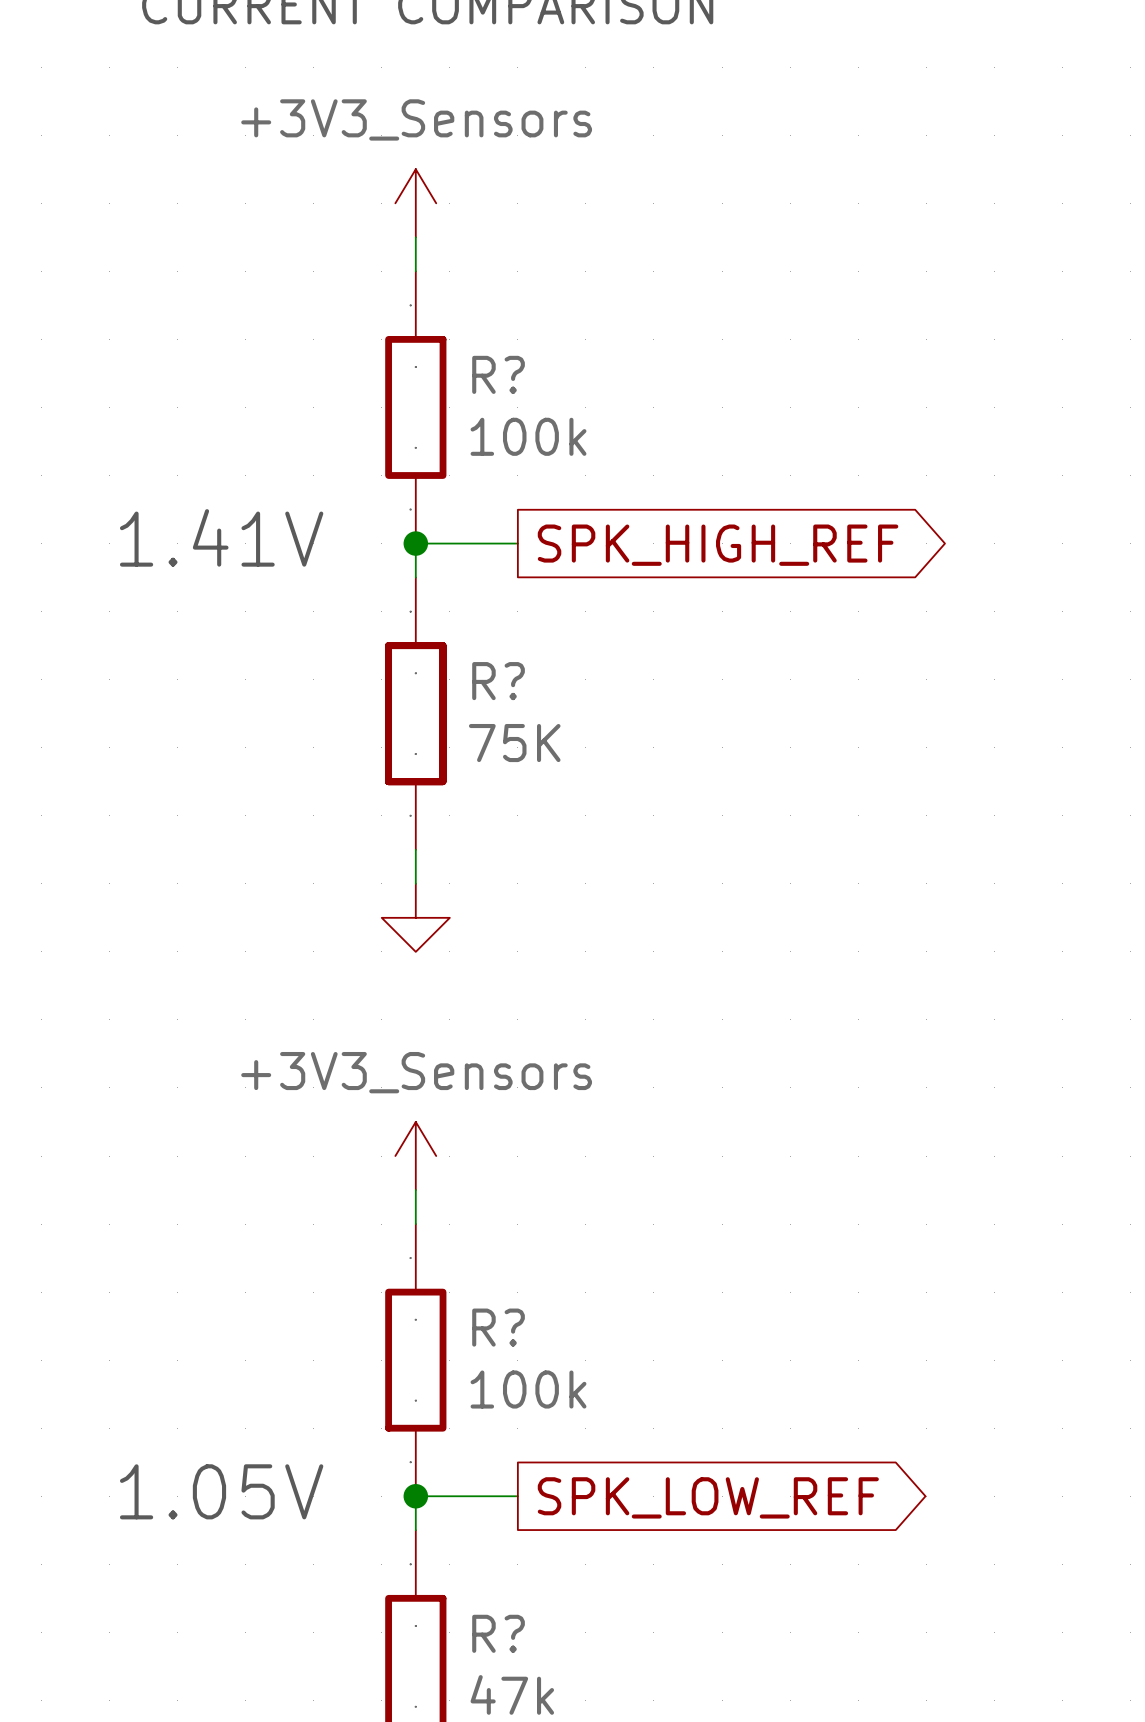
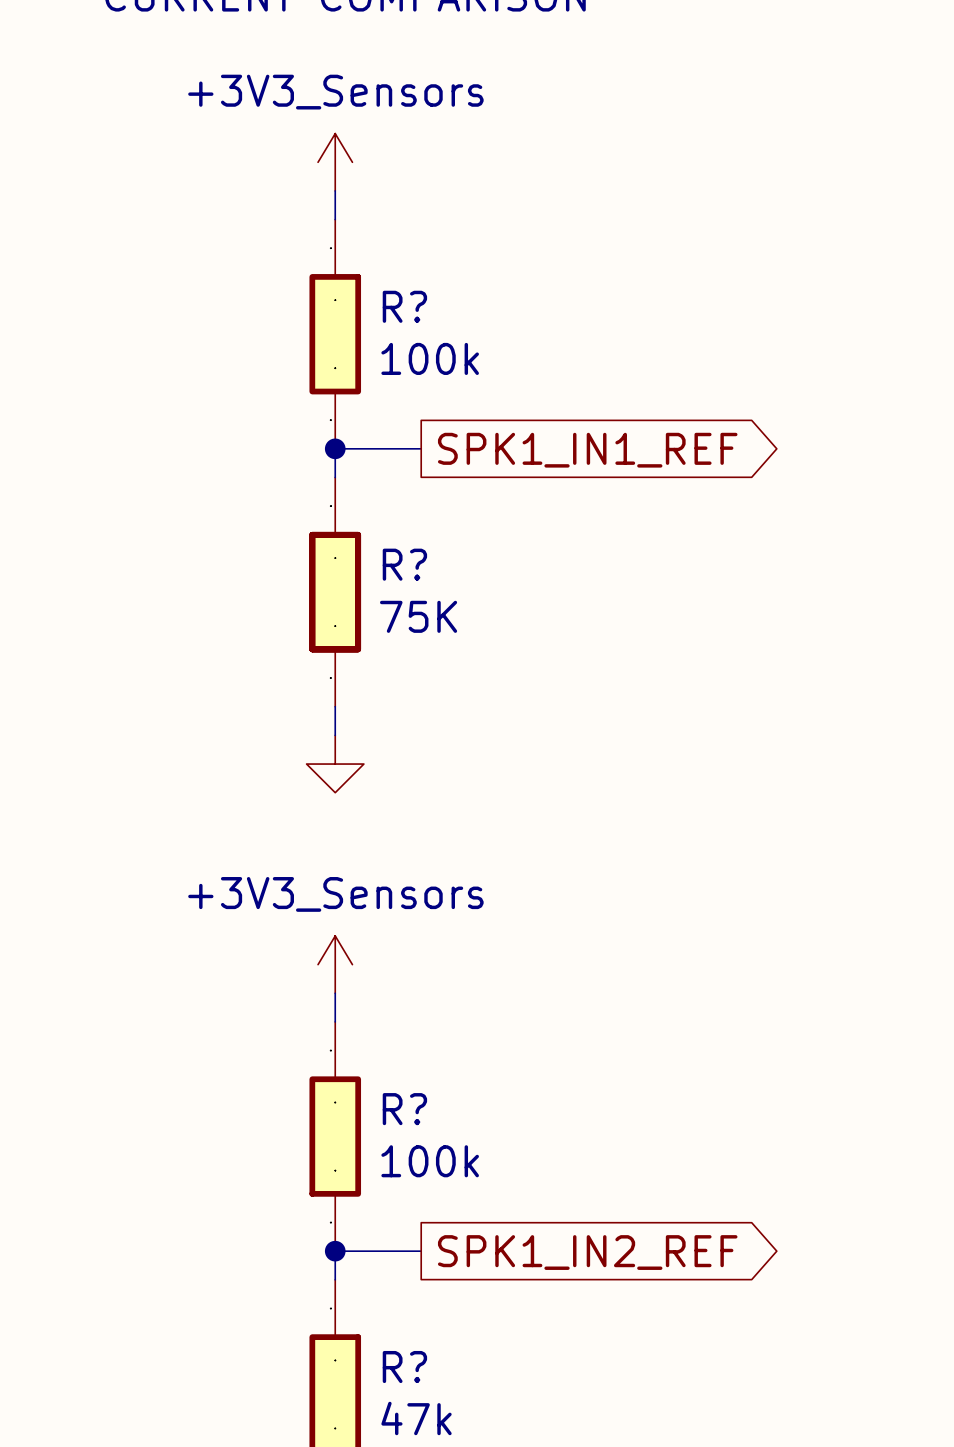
text: 1.41V (221, 537) -> none
global label: SPK_HIGH_REF (718, 545) -> SPK1_IN1_REF (587, 450)
text: 1.05V (221, 1491) -> none
global label: SPK_LOW_REF (708, 1497) -> SPK1_IN2_REF (587, 1252)

